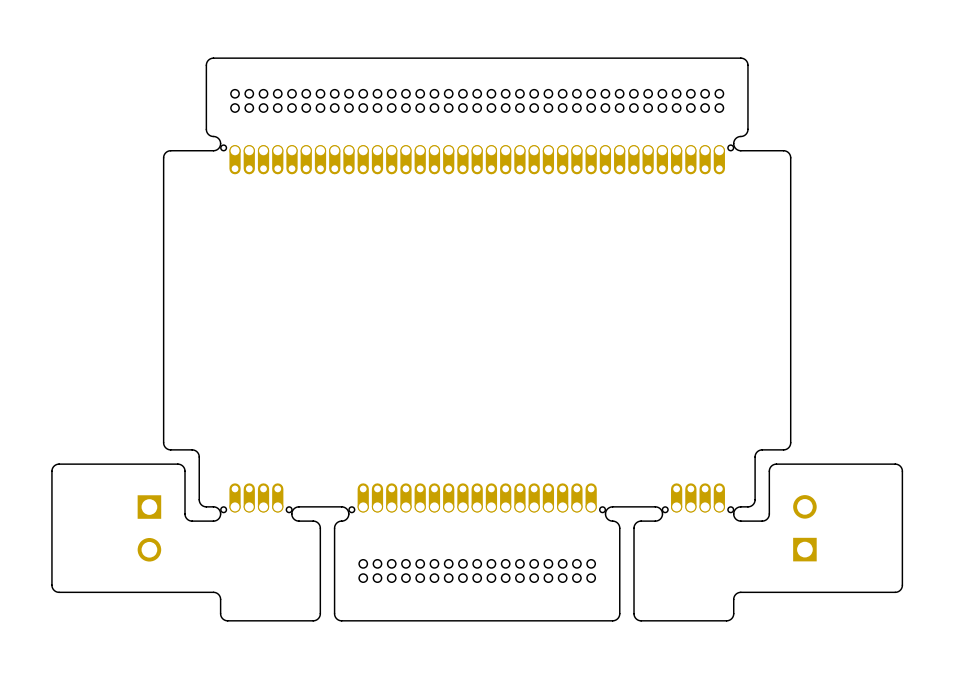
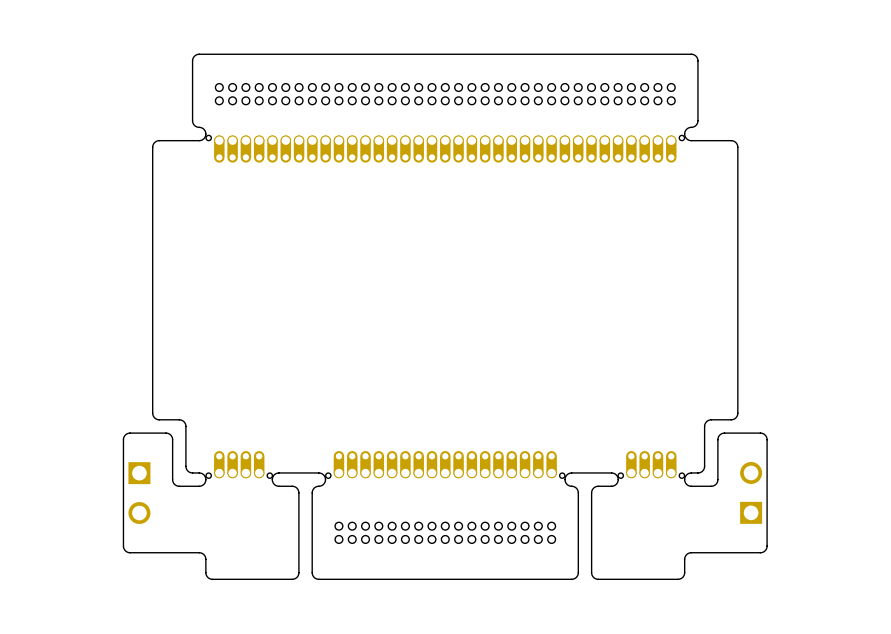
board edge: (139, 464) (58, 464) (53, 466) (51, 471) (53, 589) (59, 592) (139, 592) -> (130, 433) (125, 435) (123, 439) (123, 546) (125, 551) (130, 552)
board edge: (814, 464) (896, 464) (900, 466) (902, 471) (900, 589) (895, 592) (814, 592) -> (760, 433) (765, 435) (767, 439) (767, 546) (765, 550) (760, 552)

